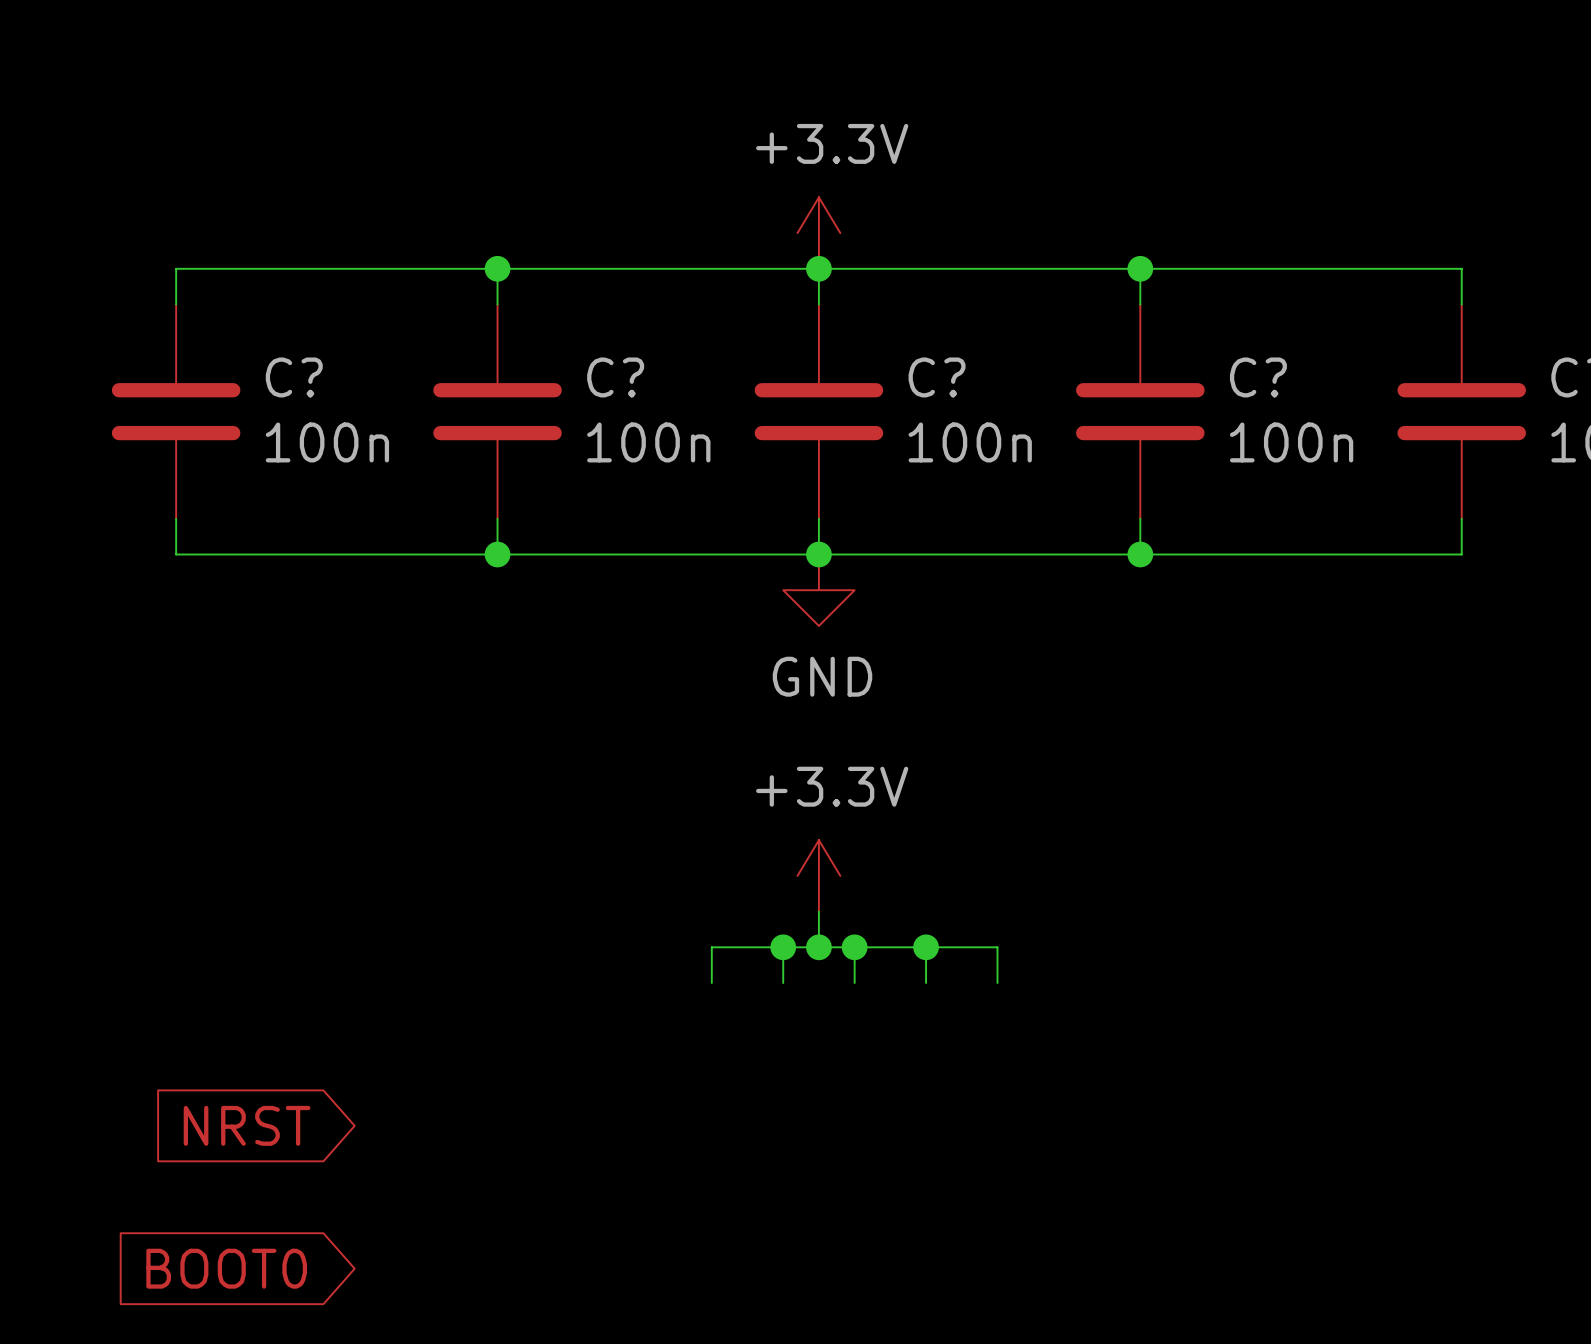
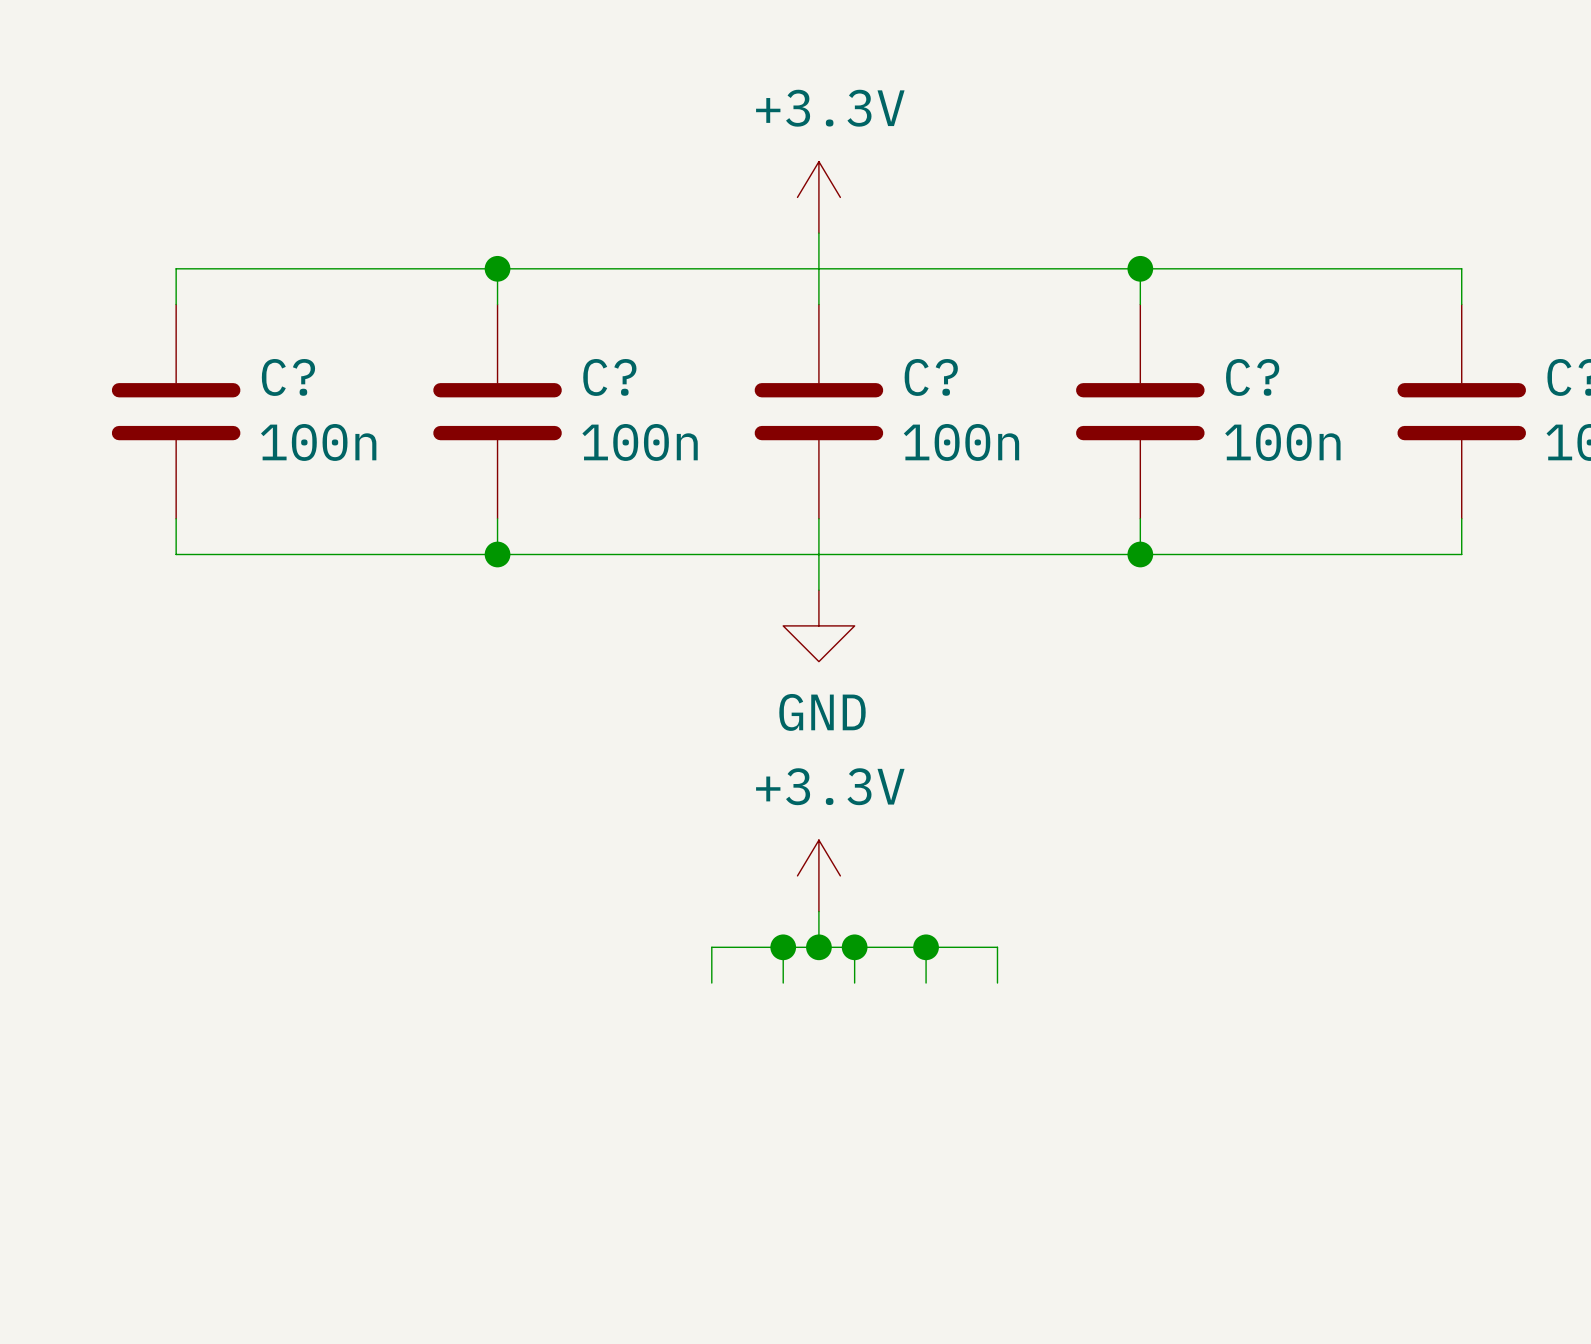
power symbol position: +3.3V (818, 233) -> +3.3V (818, 197)
junction: (818, 268) -> none
junction: (818, 554) -> none
power symbol position: GND (818, 590) -> GND (818, 625)
global label: NRST (247, 1125) -> none
global label: BOOT0 (226, 1268) -> none

